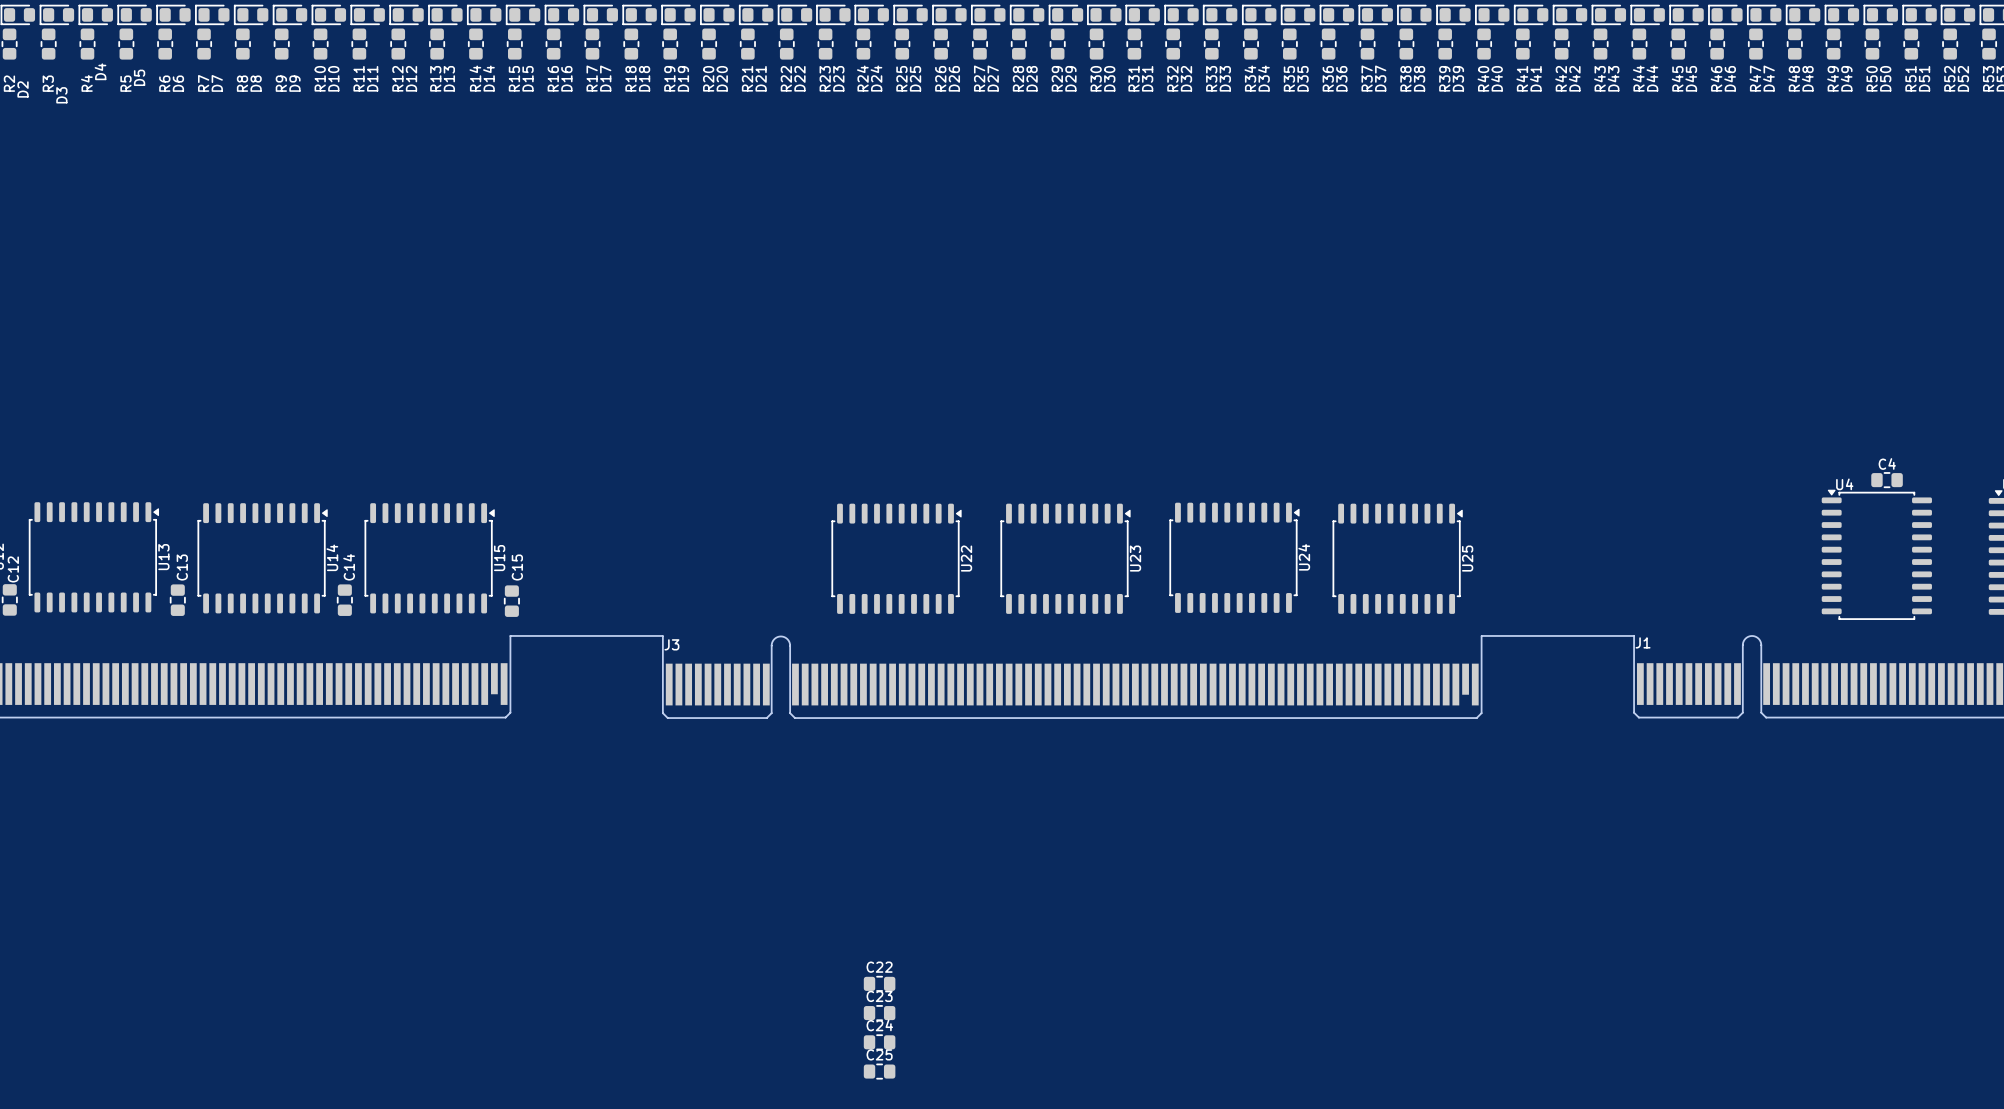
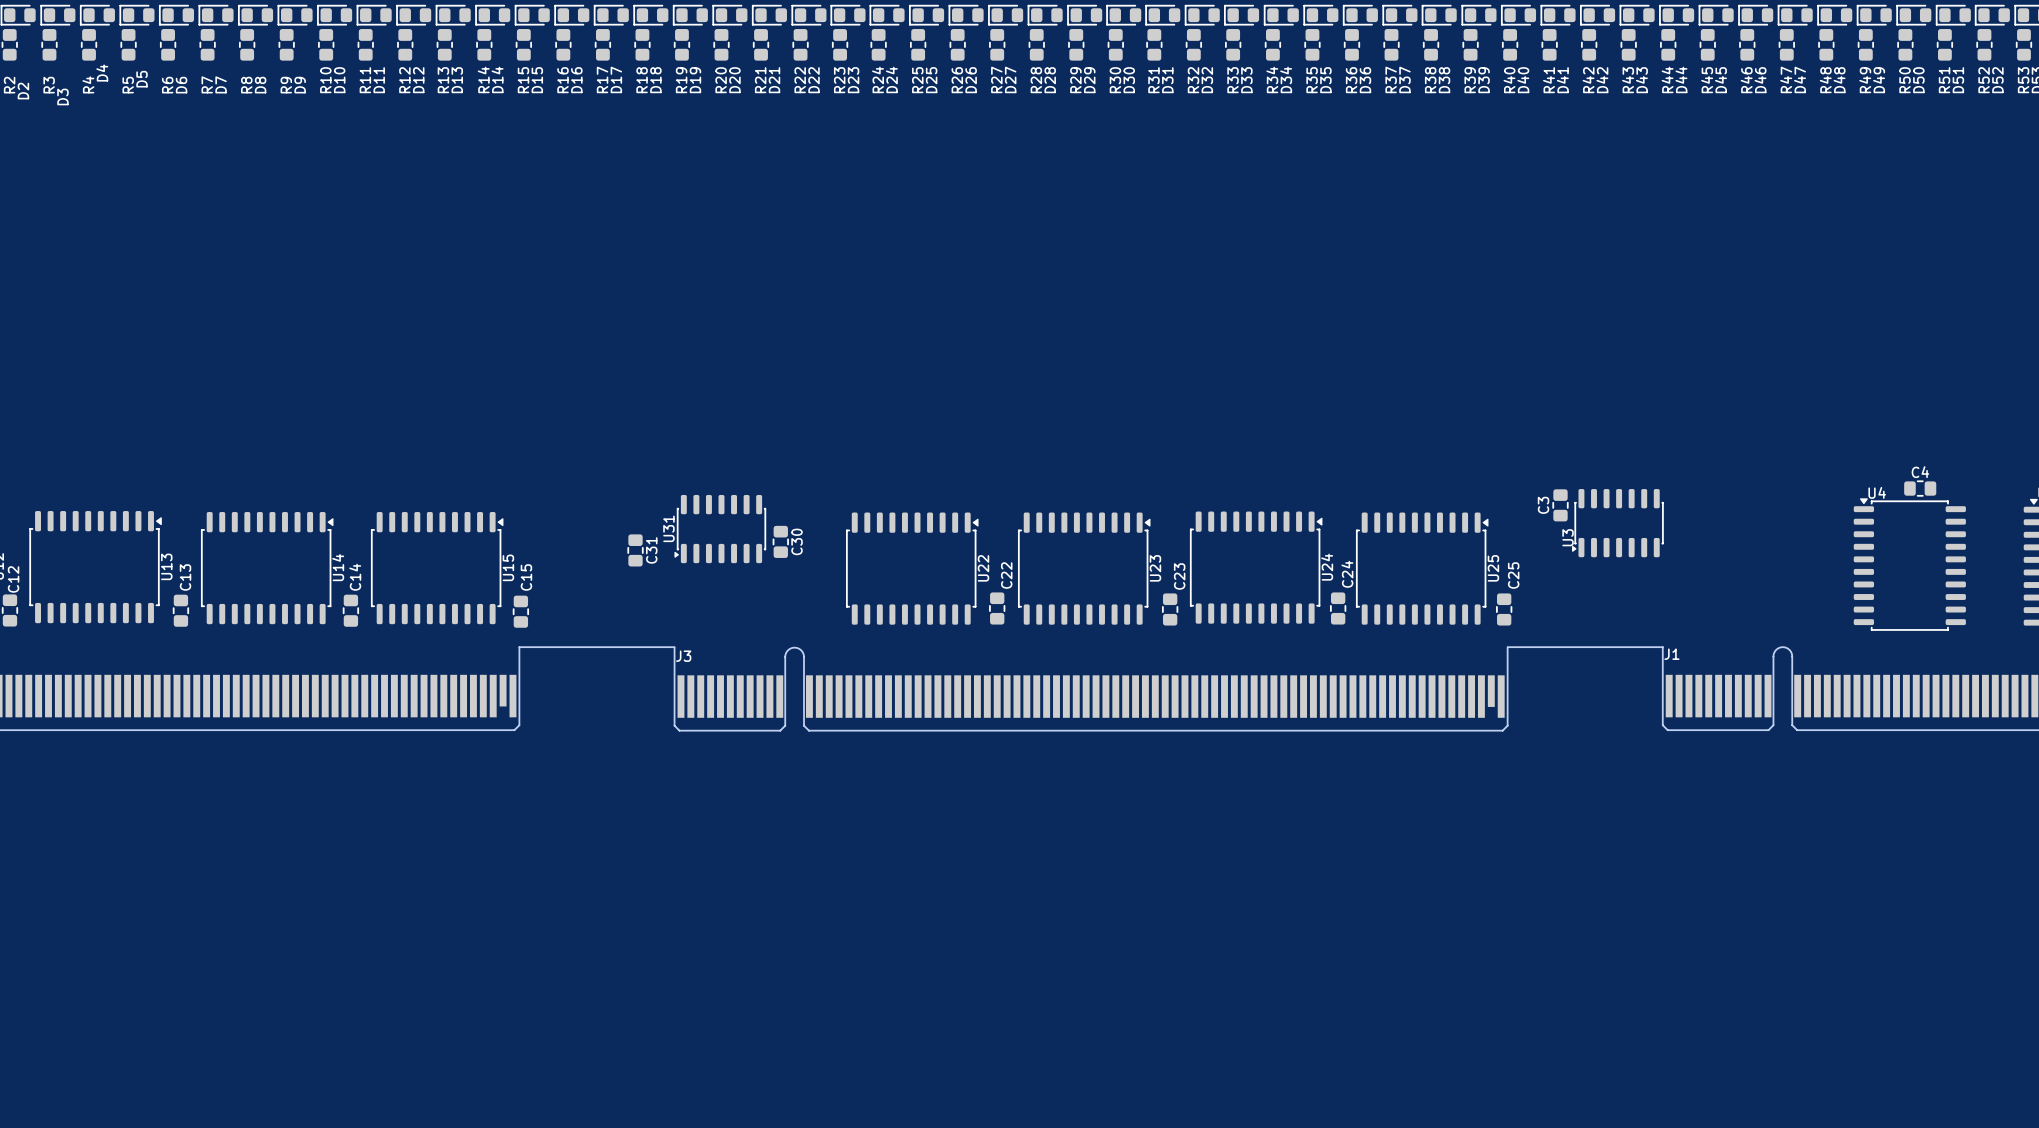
C3: none -> (1560, 505)
U3: none -> (1617, 523)
U31: none -> (720, 529)
C30: none -> (780, 541)
C31: none -> (635, 550)
C22 rotation: 0° (879, 983) -> 90° clockwise (997, 608)
C22 position: (879, 983) -> (997, 608)
C23 rotation: 0° (879, 1013) -> 90° clockwise (1170, 609)
C23 position: (879, 1013) -> (1170, 609)
C24 name position: C24 (879, 1025) -> C24 (1347, 574)
C24 rotation: 0° (879, 1042) -> 90° clockwise (1338, 608)
C24 position: (879, 1042) -> (1338, 608)
C25 name position: C25 (879, 1054) -> C25 (1513, 575)
C25 rotation: 0° (879, 1071) -> 90° clockwise (1504, 609)
C25 position: (879, 1071) -> (1504, 609)

